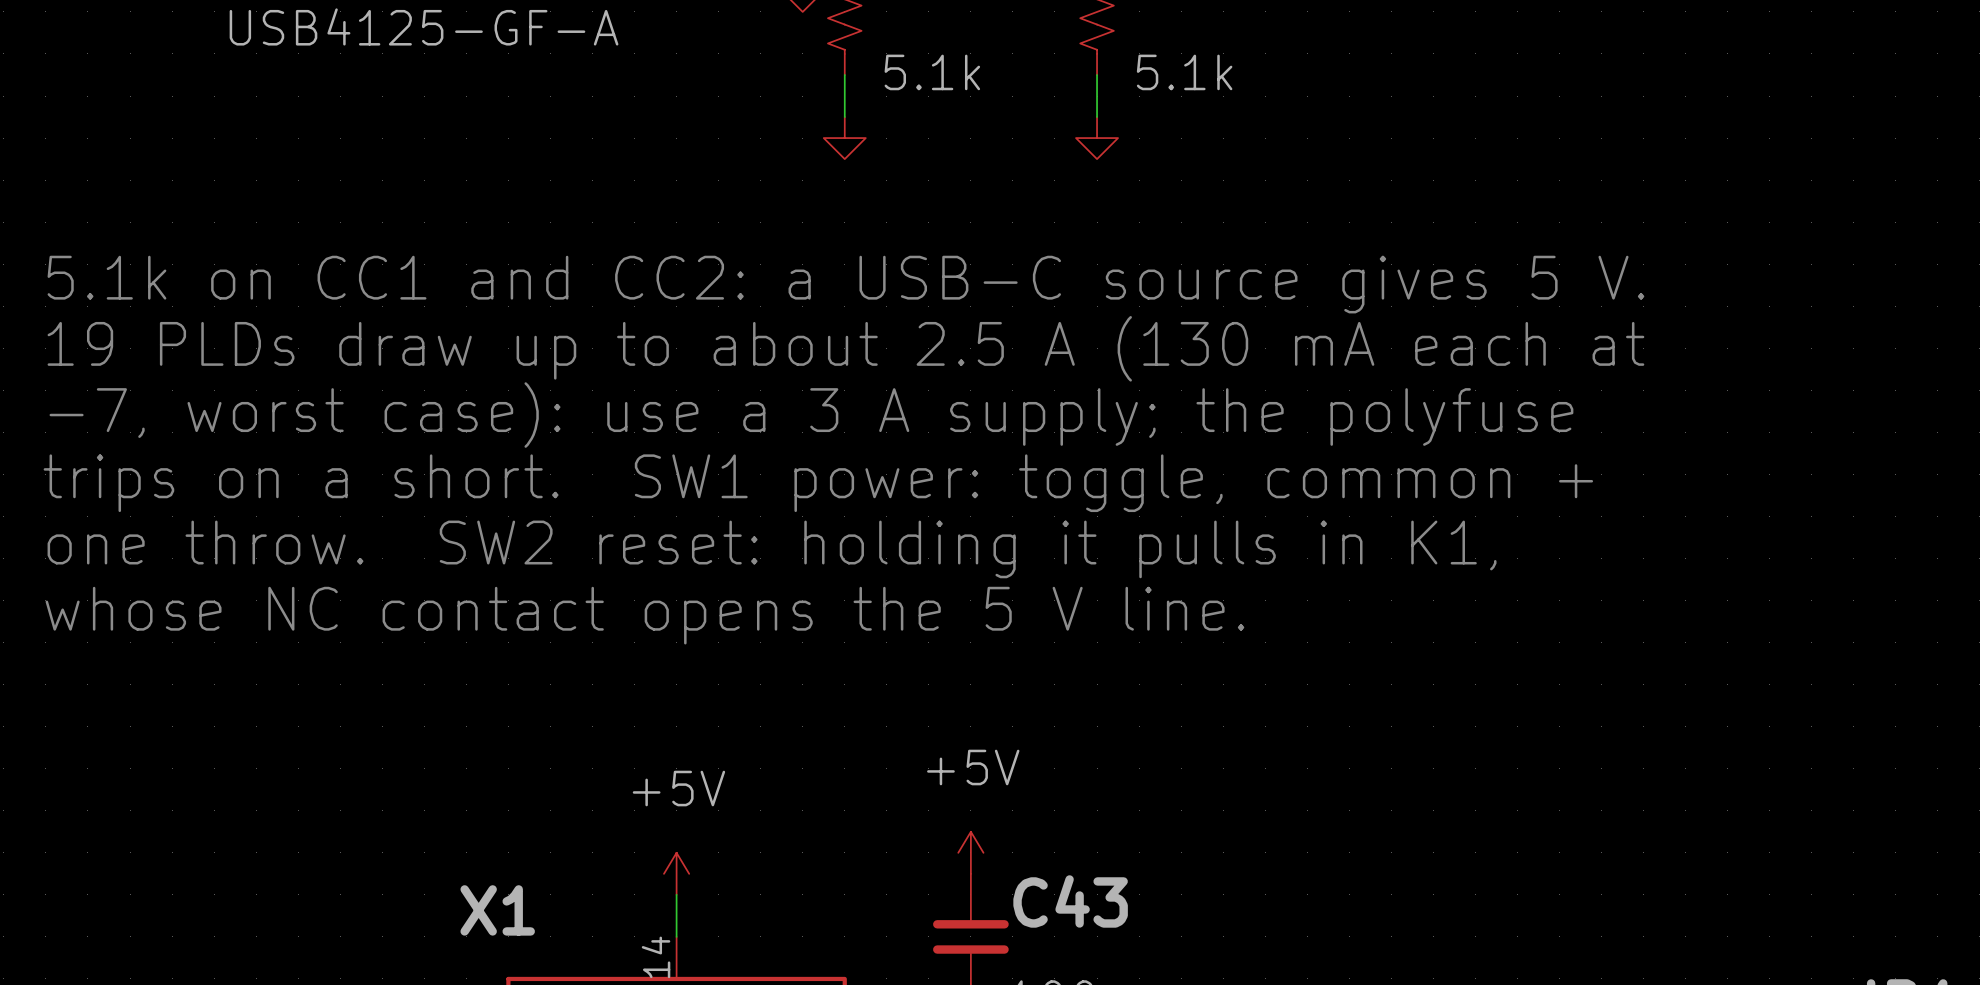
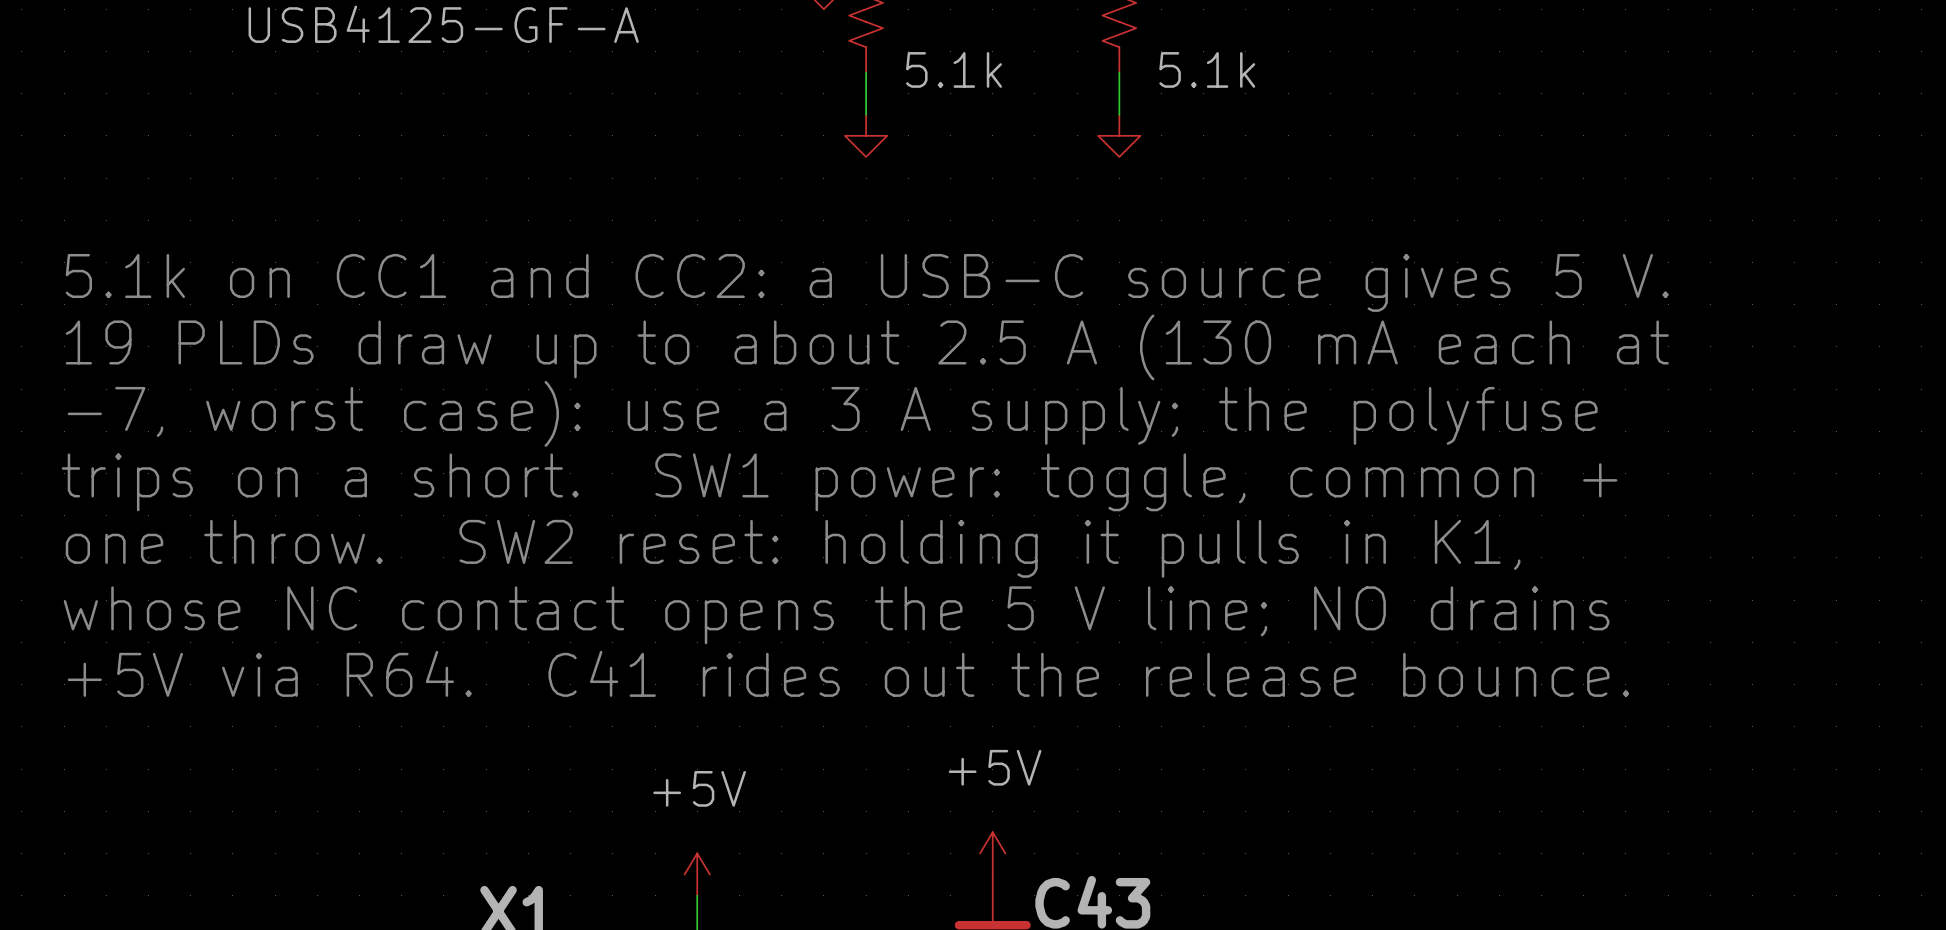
text: whose NC contact opens the 5 V line. (644, 615) -> whose NC contact opens the 5 V line; NO drains (836, 615)
text: none -> +5V via R64. C41 rides out the release bounce. (848, 673)

